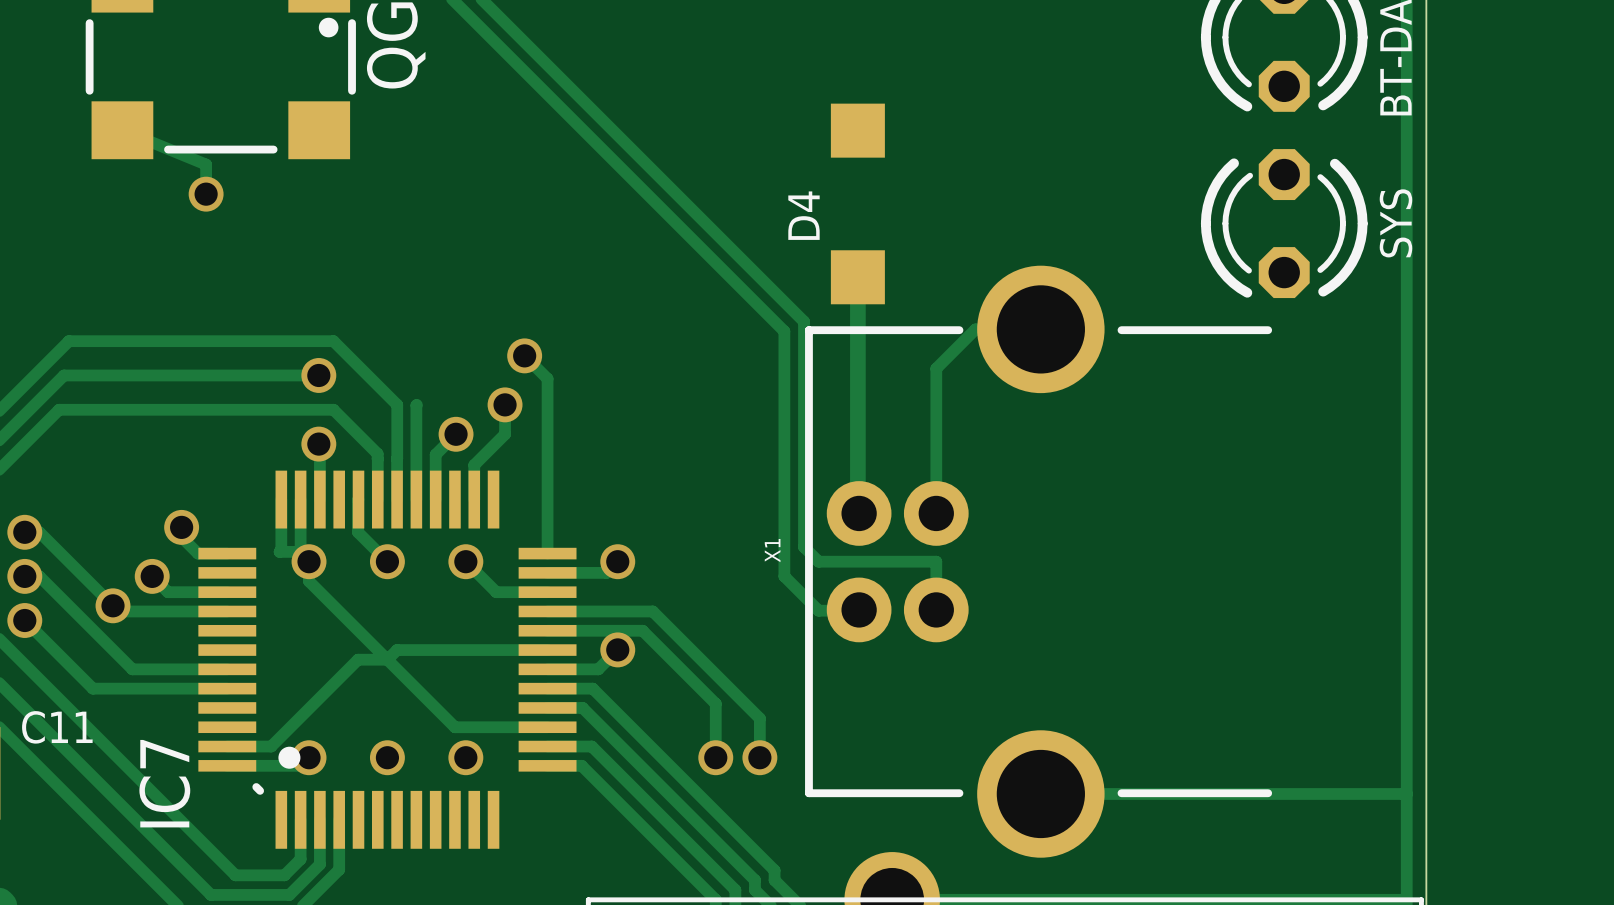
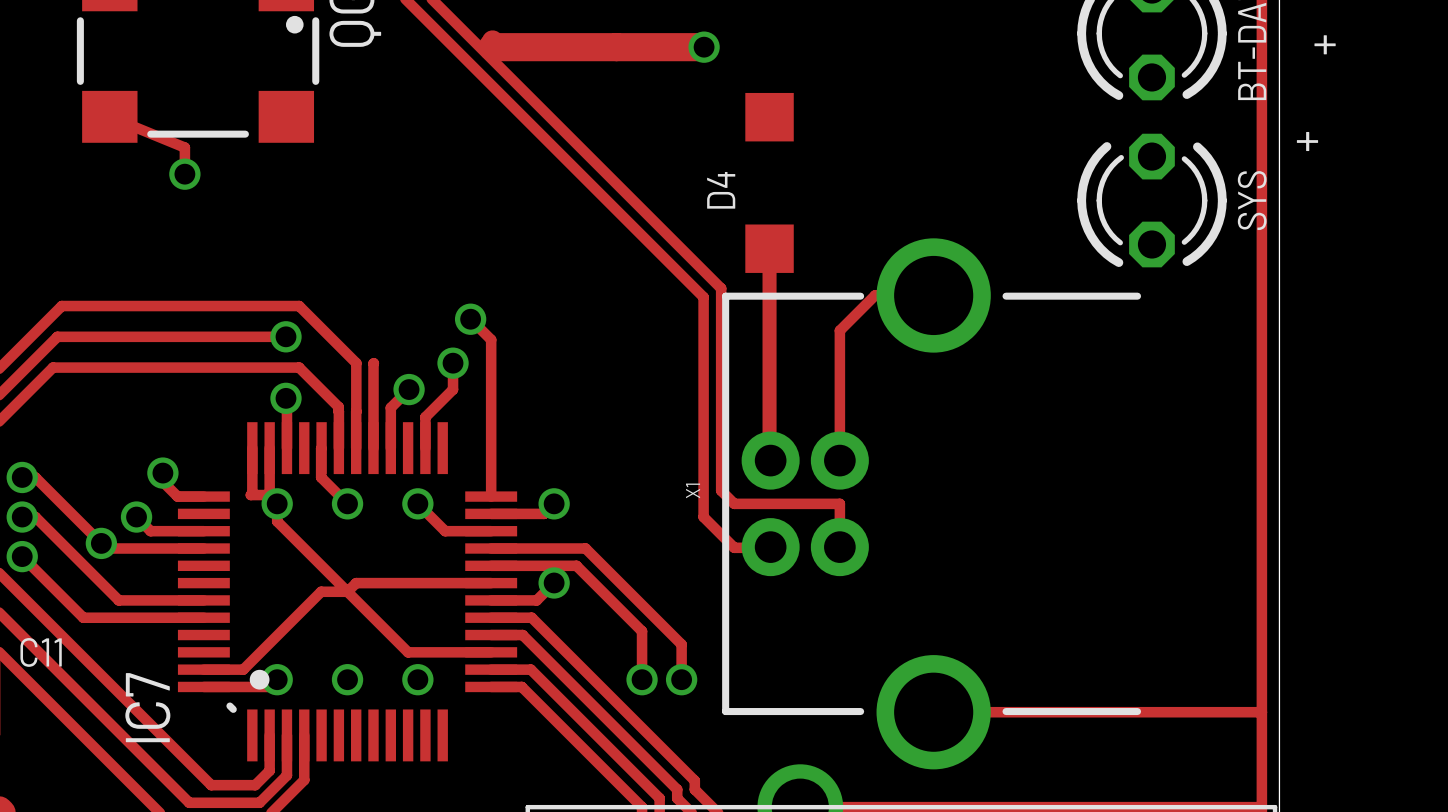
track: none -> (492, 40) (492, 47) (704, 47)
via: none -> (704, 47)
text: none -> + (1325, 44)
text: none -> + (1307, 141)

